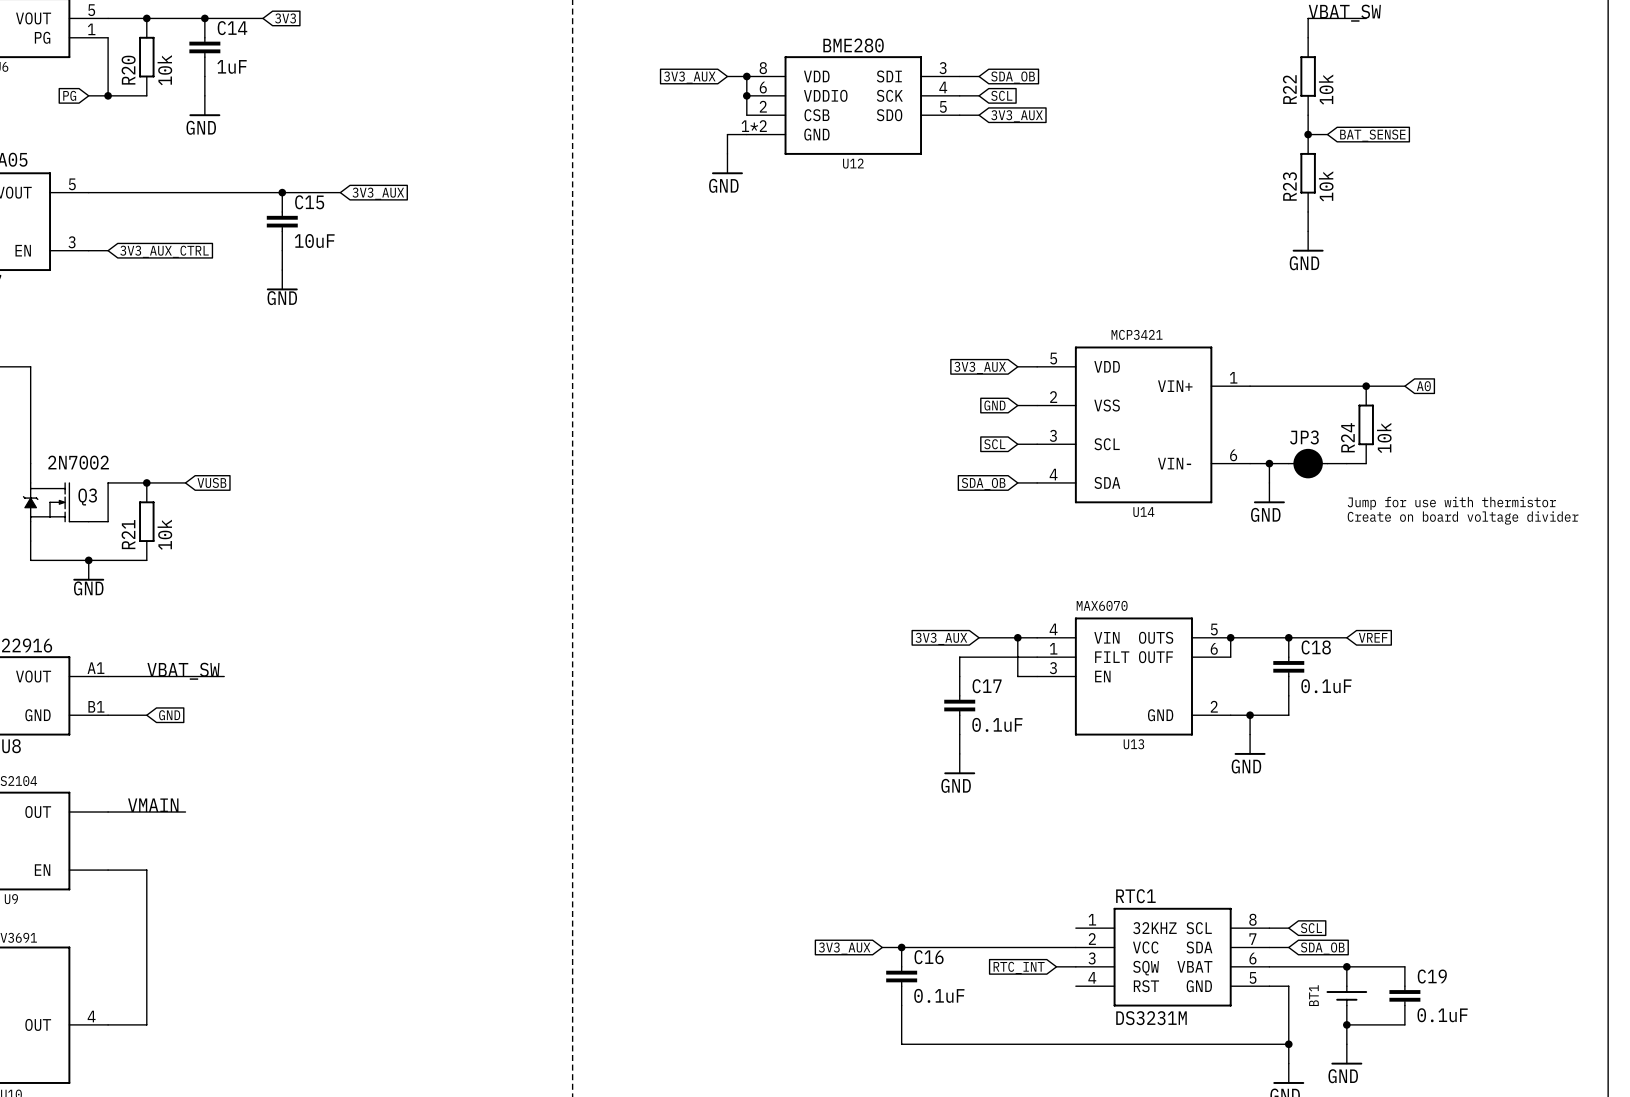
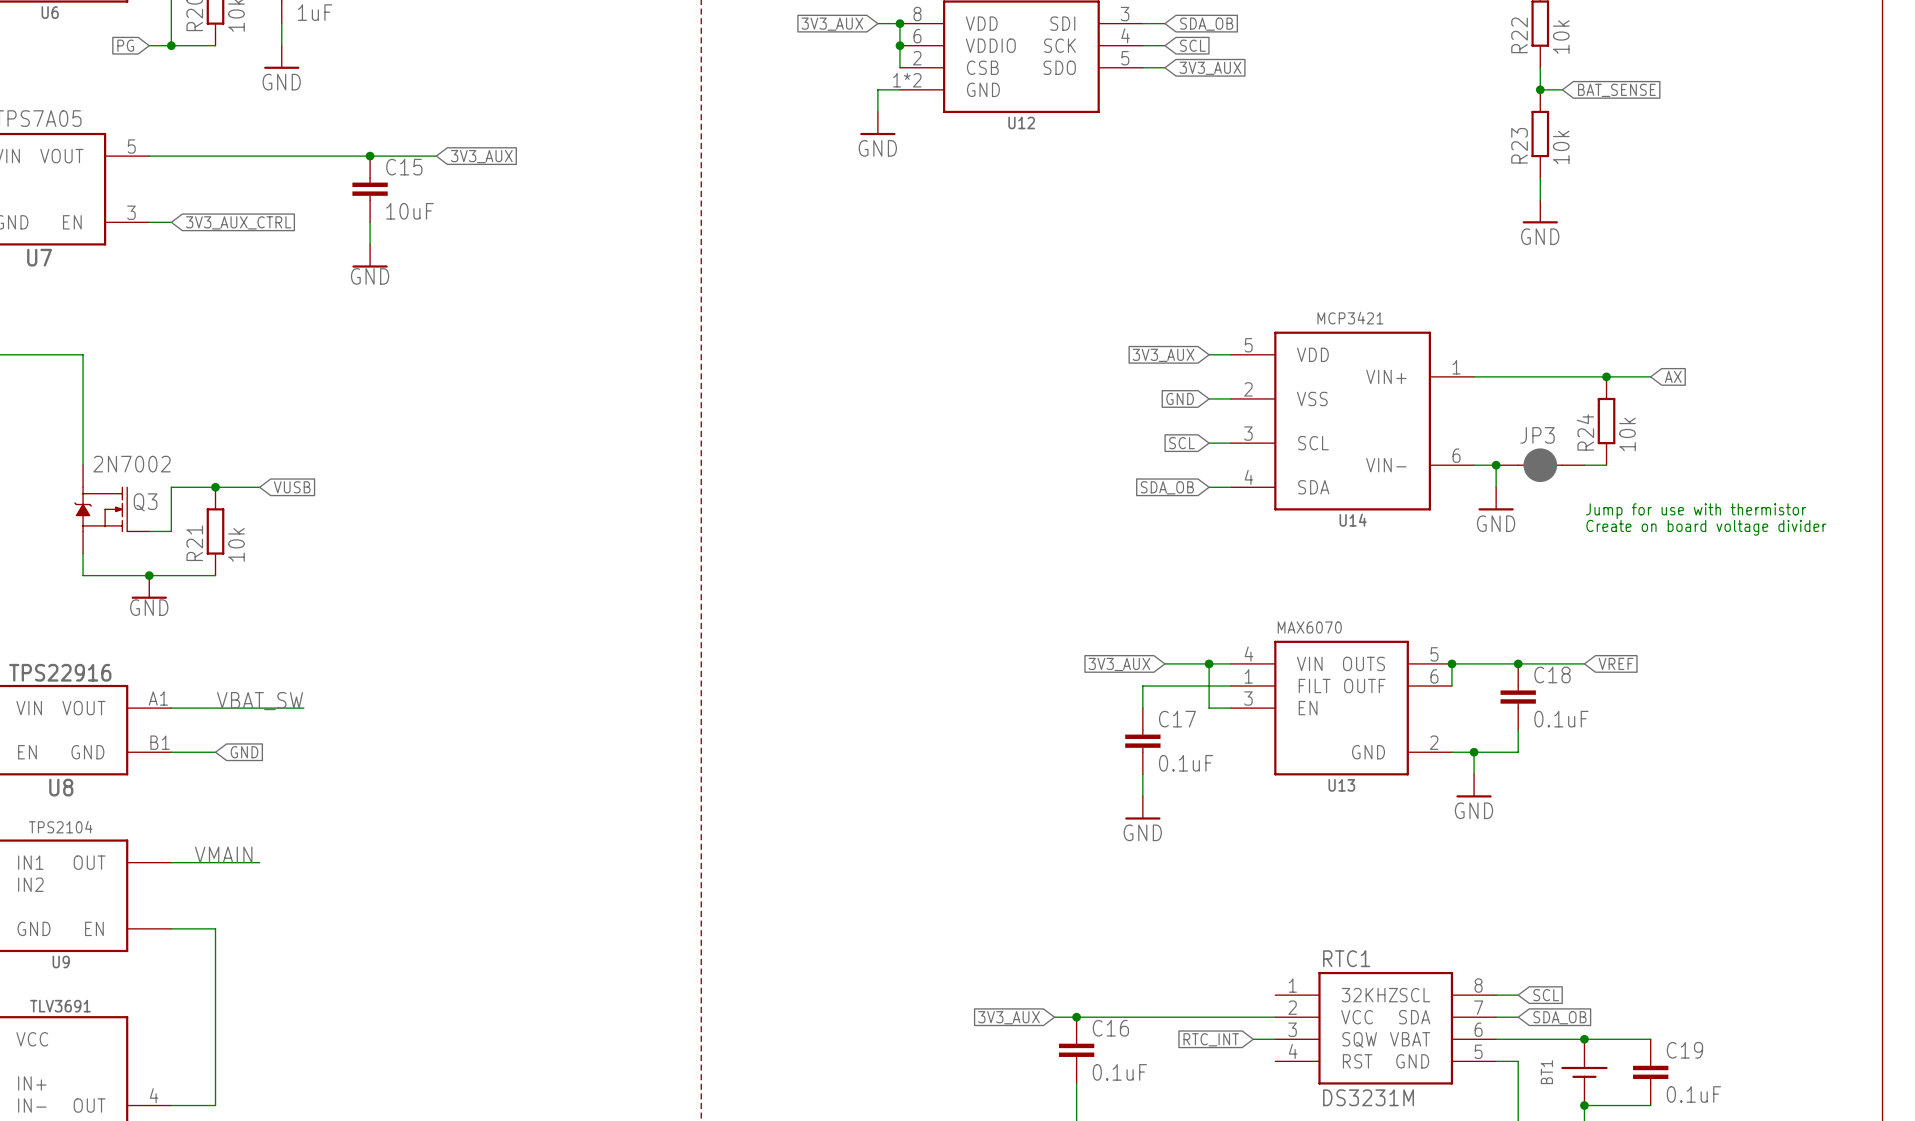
global label: A0 (1423, 386) -> AX (1673, 376)

